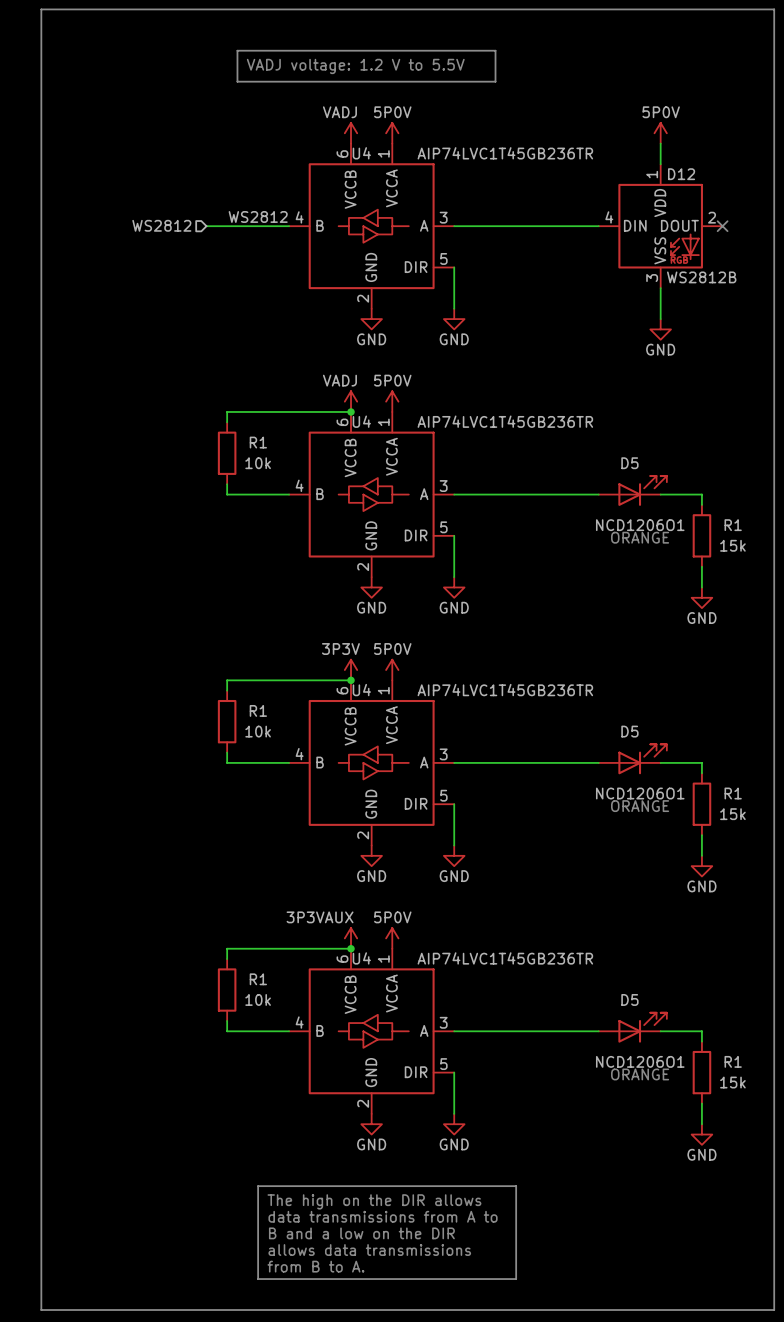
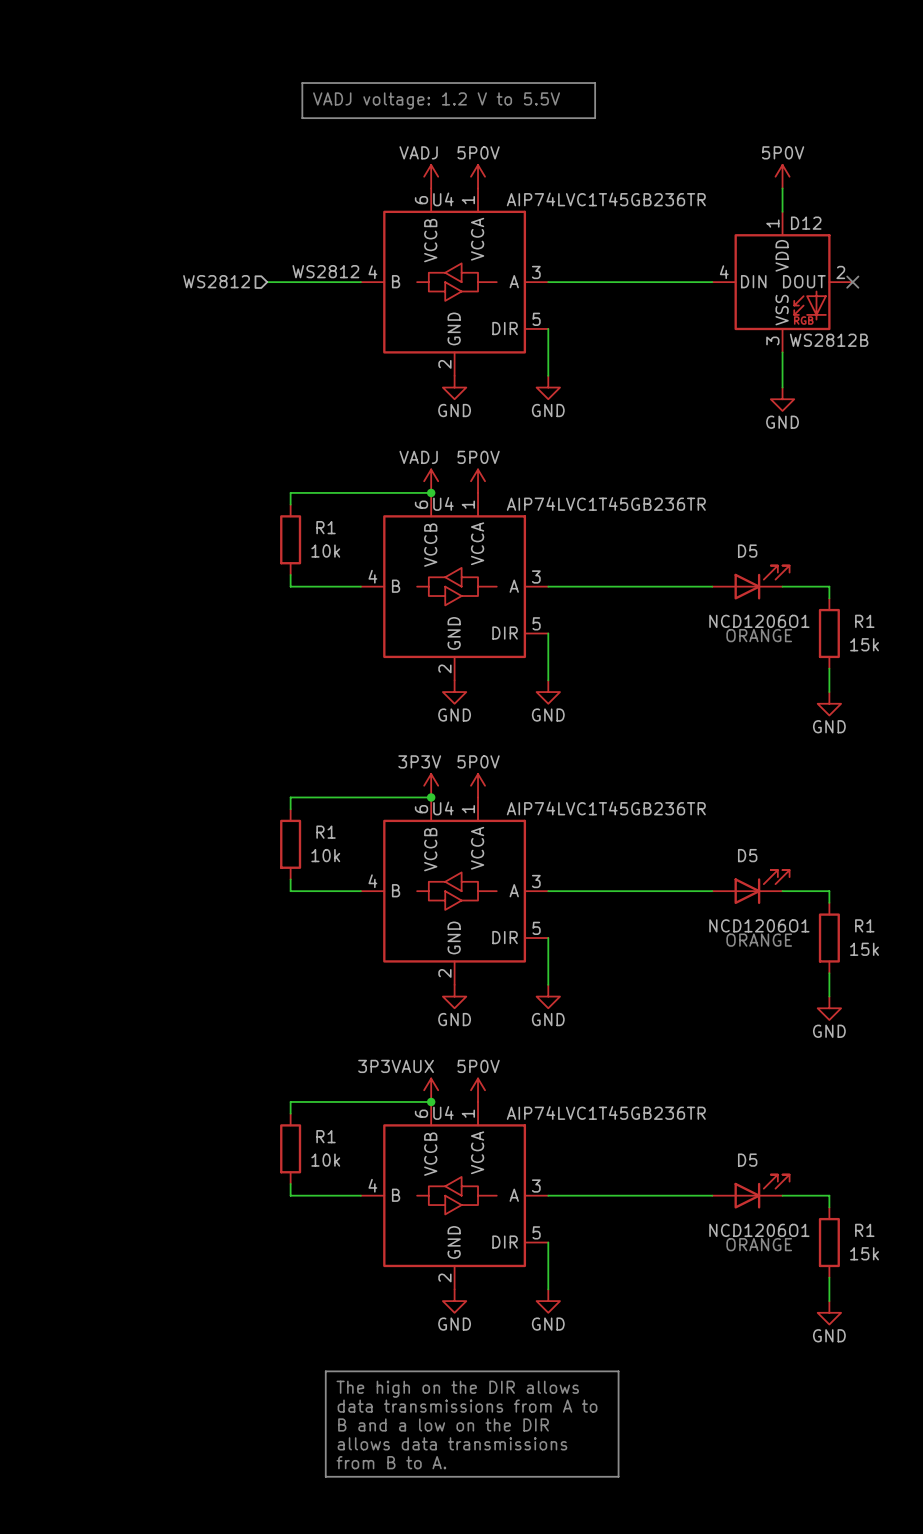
line: (41, 9) (774, 9) (774, 1310) (41, 1310) (41, 9) -> none

